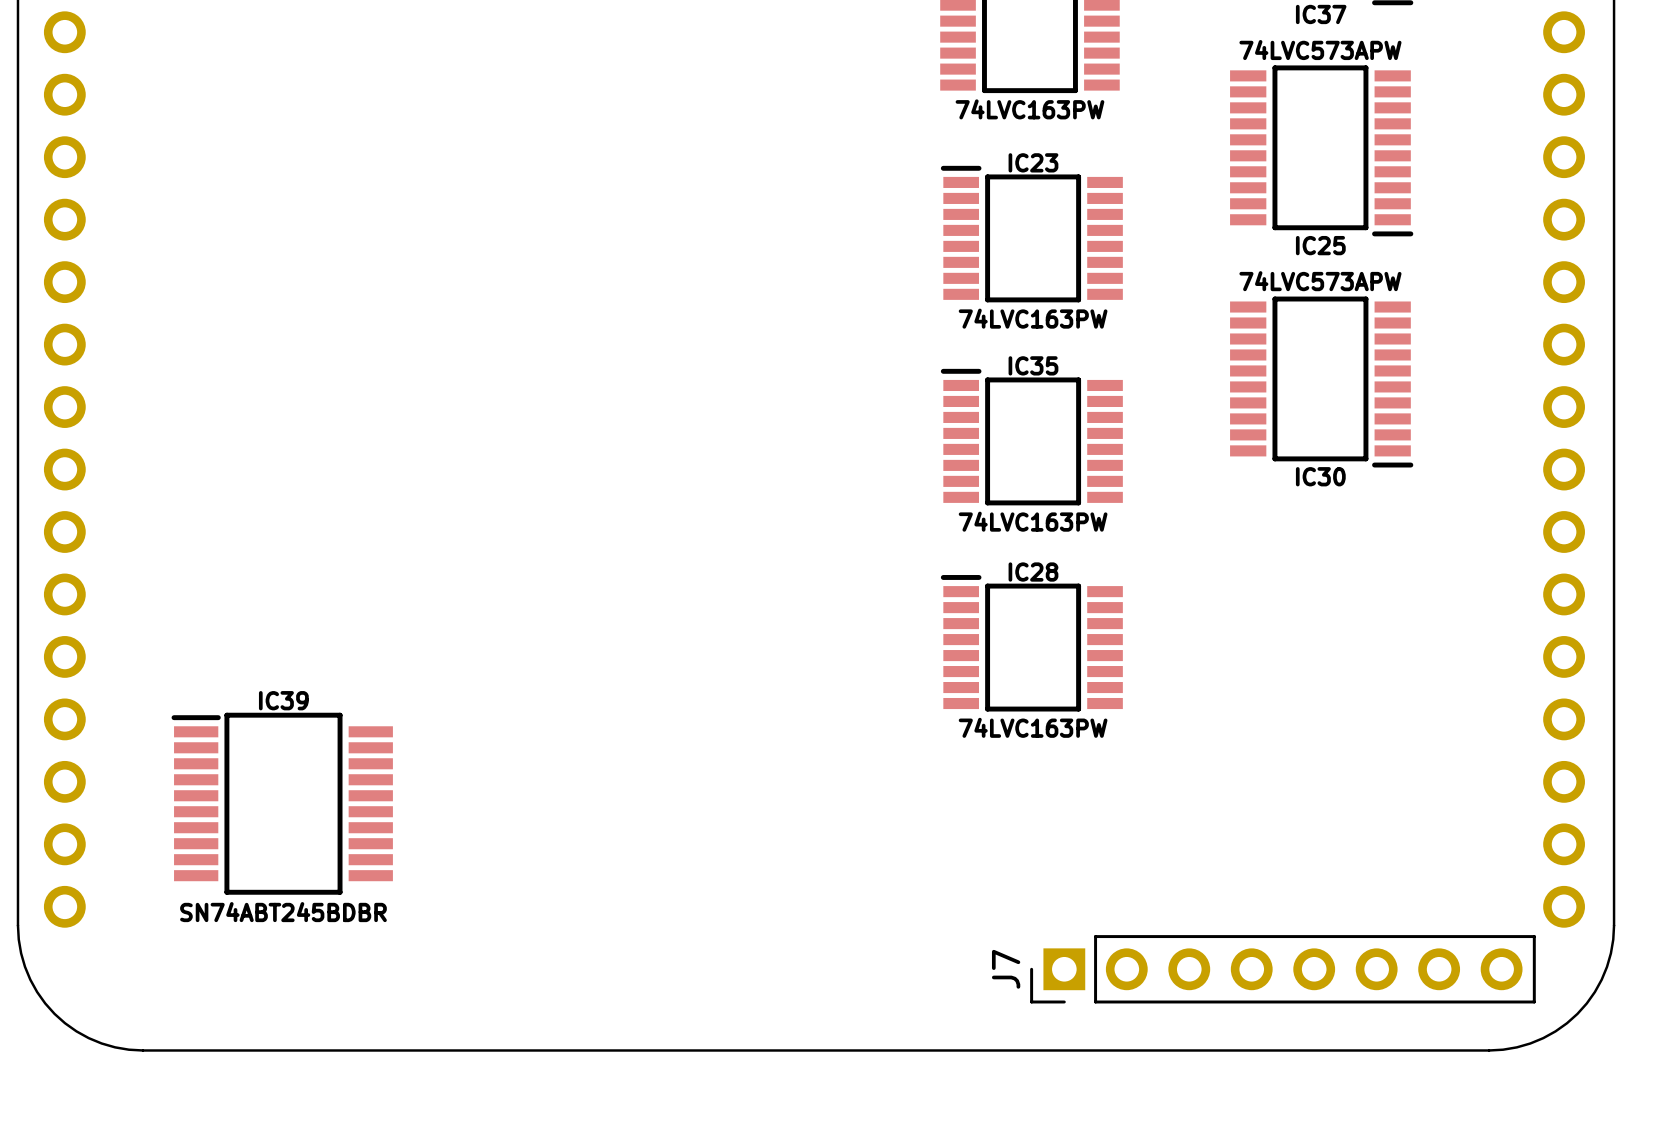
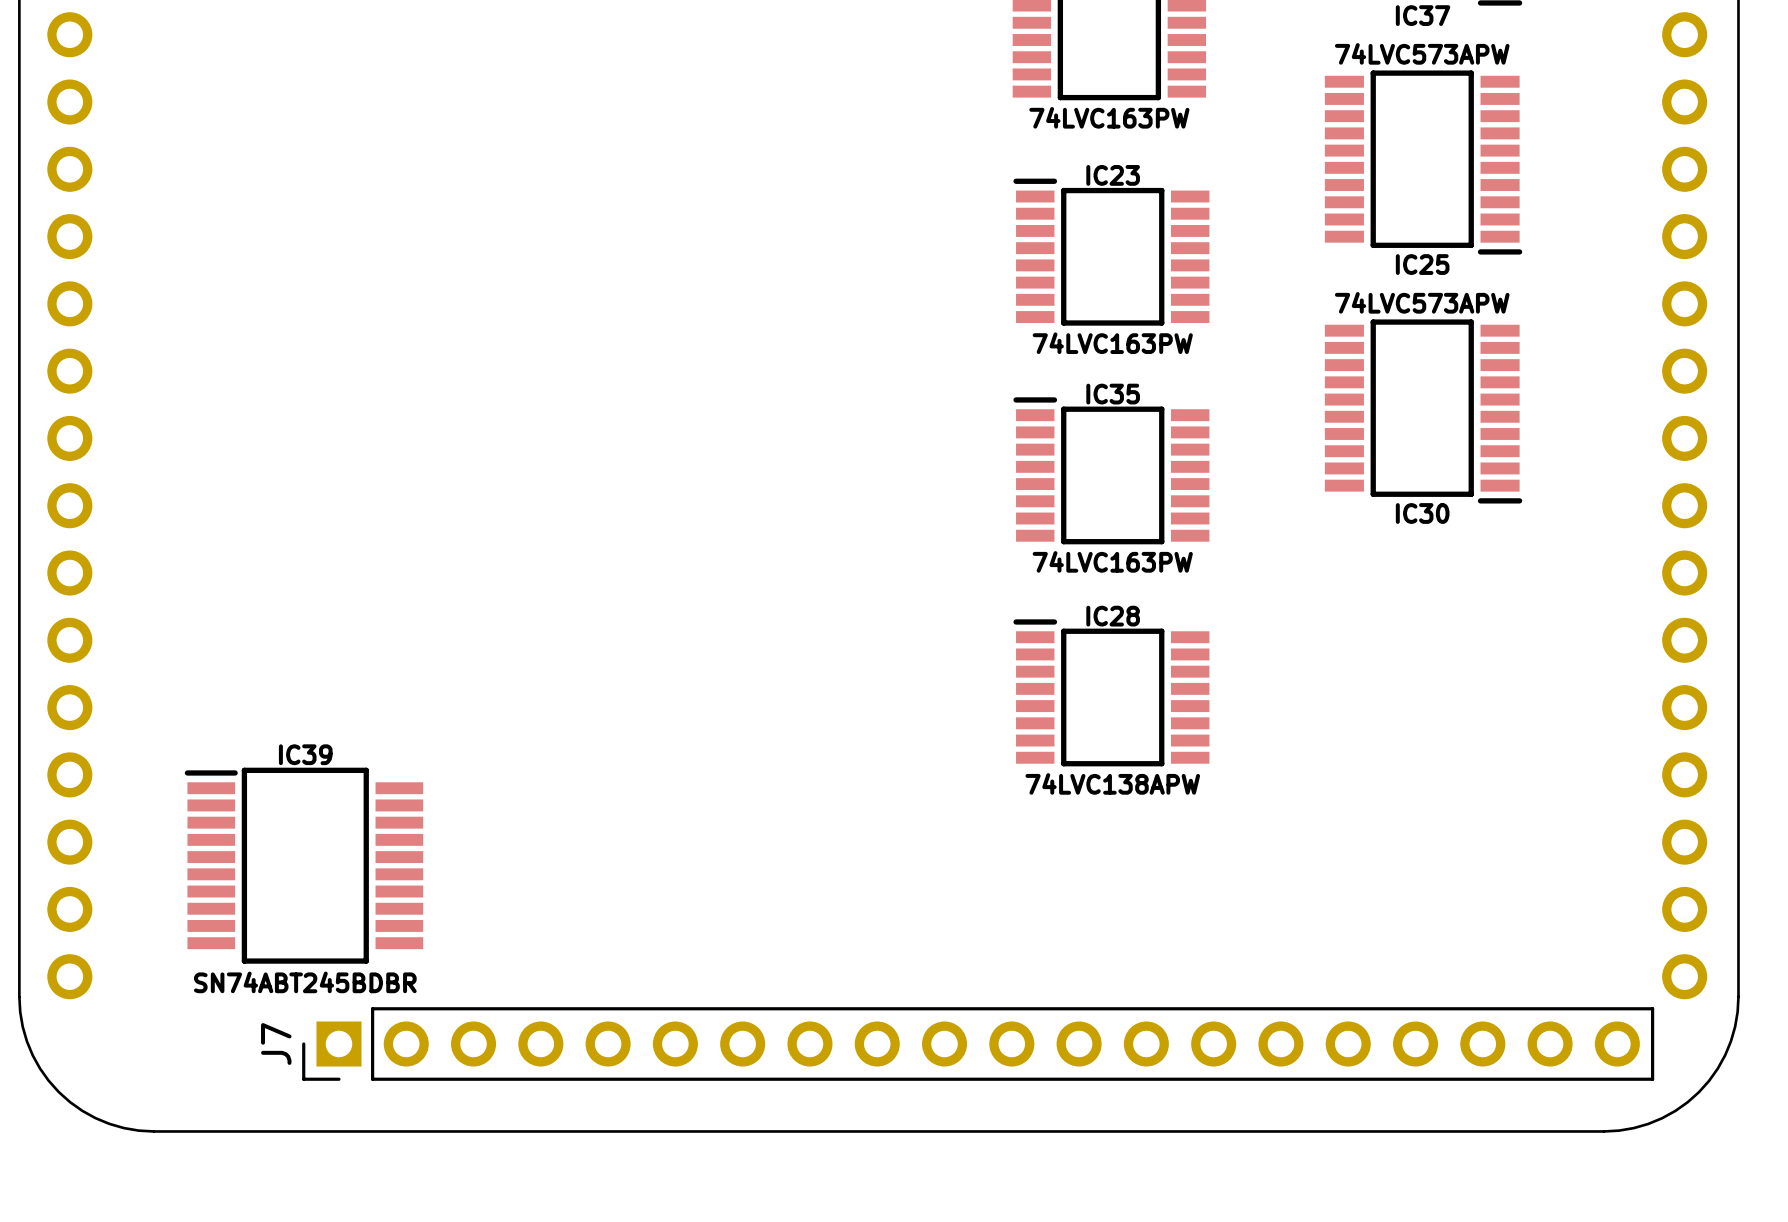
IC28 text: 74LVC163PW (1033, 727) -> 74LVC138APW (1112, 783)
J7 footprint: [1030, 935, 1536, 1004] -> [302, 1007, 1655, 1081]
J7 name position: J7 (1006, 969) -> J7 (276, 1044)

